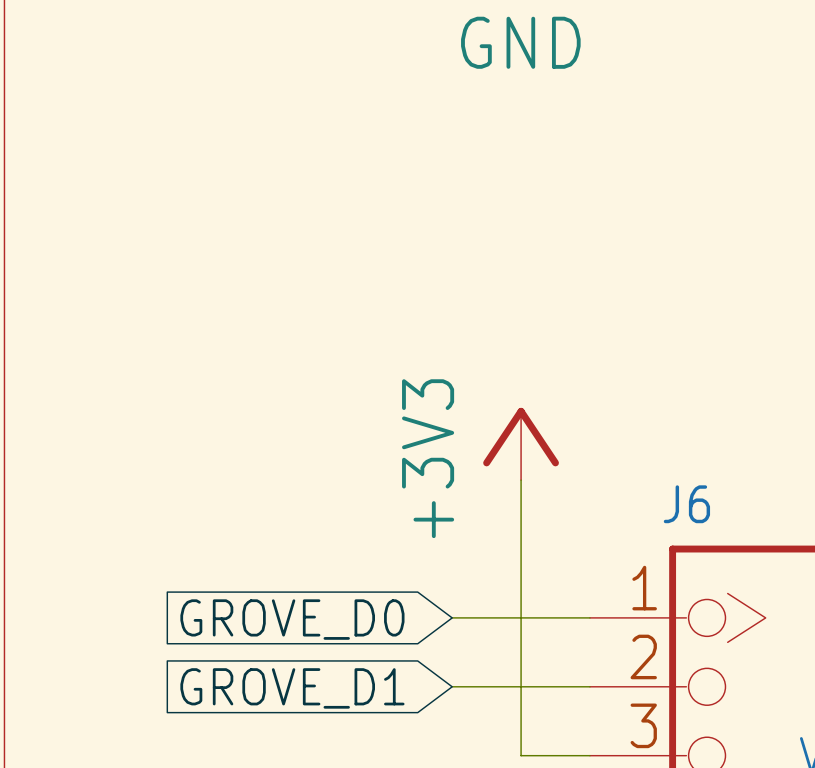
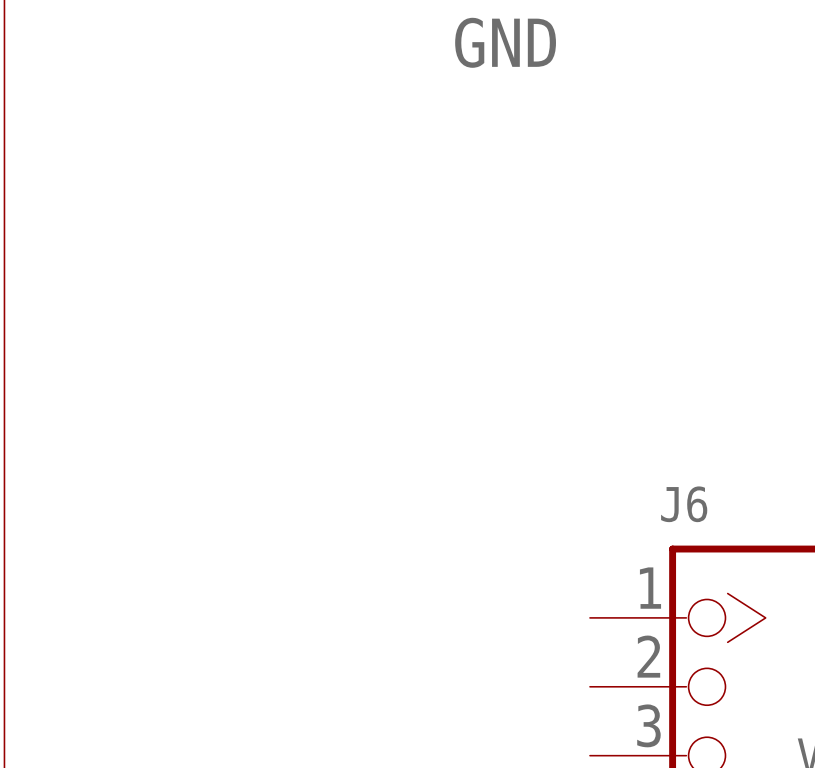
power symbol: +3V3 (521, 443) -> none
wire: (521, 480) (521, 755) (589, 755) -> none
wire: (452, 617) (589, 617) -> none
global label: GROVE_D0 (292, 619) -> none
wire: (452, 686) (589, 686) -> none
global label: GROVE_D1 (292, 688) -> none

